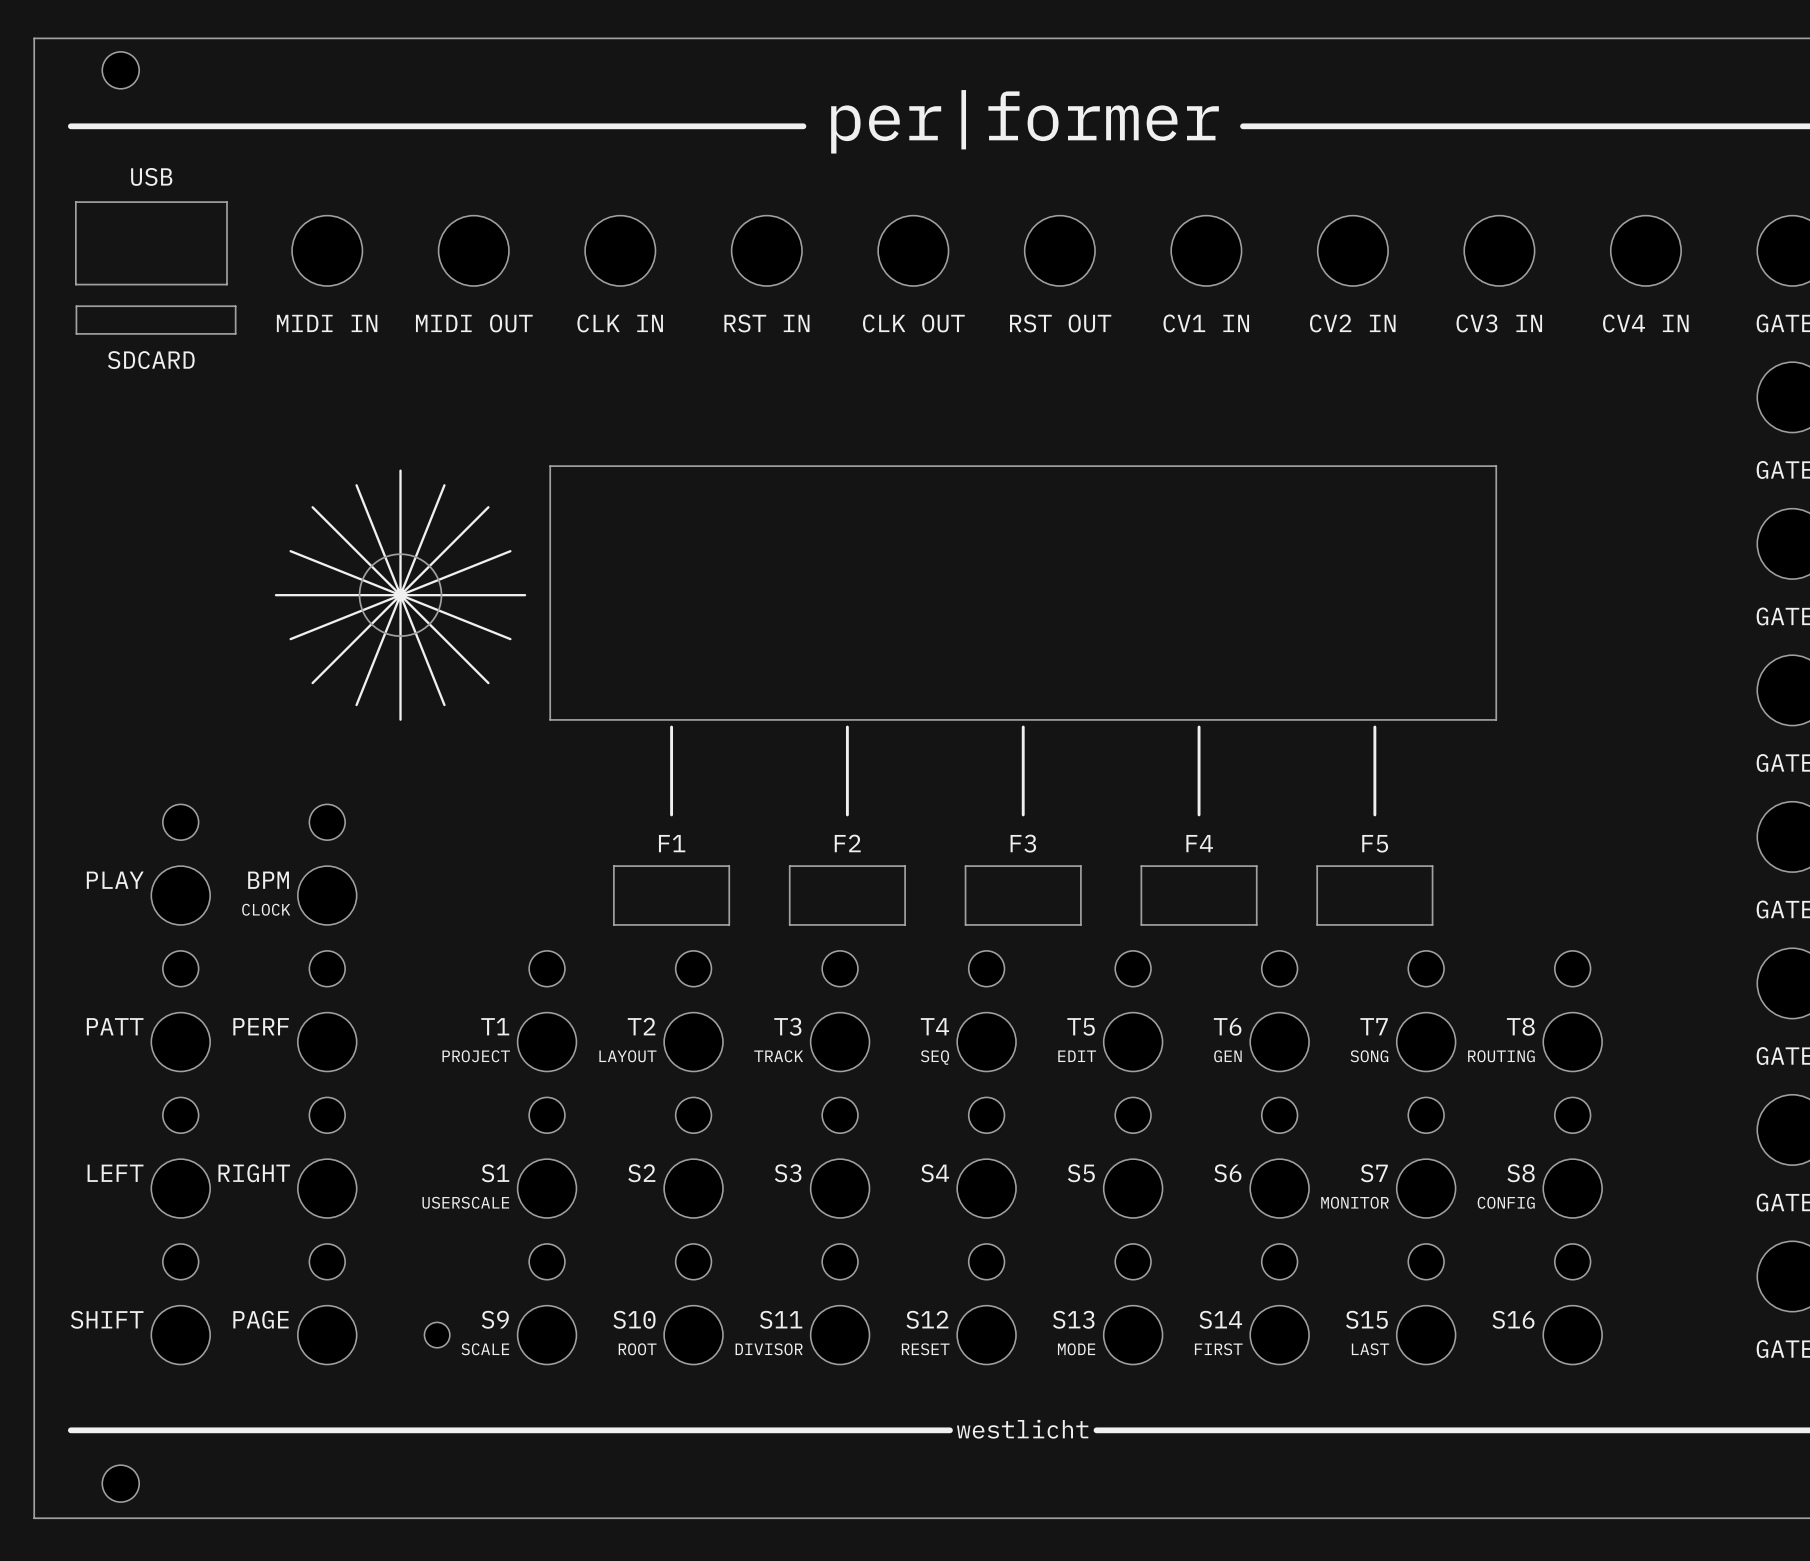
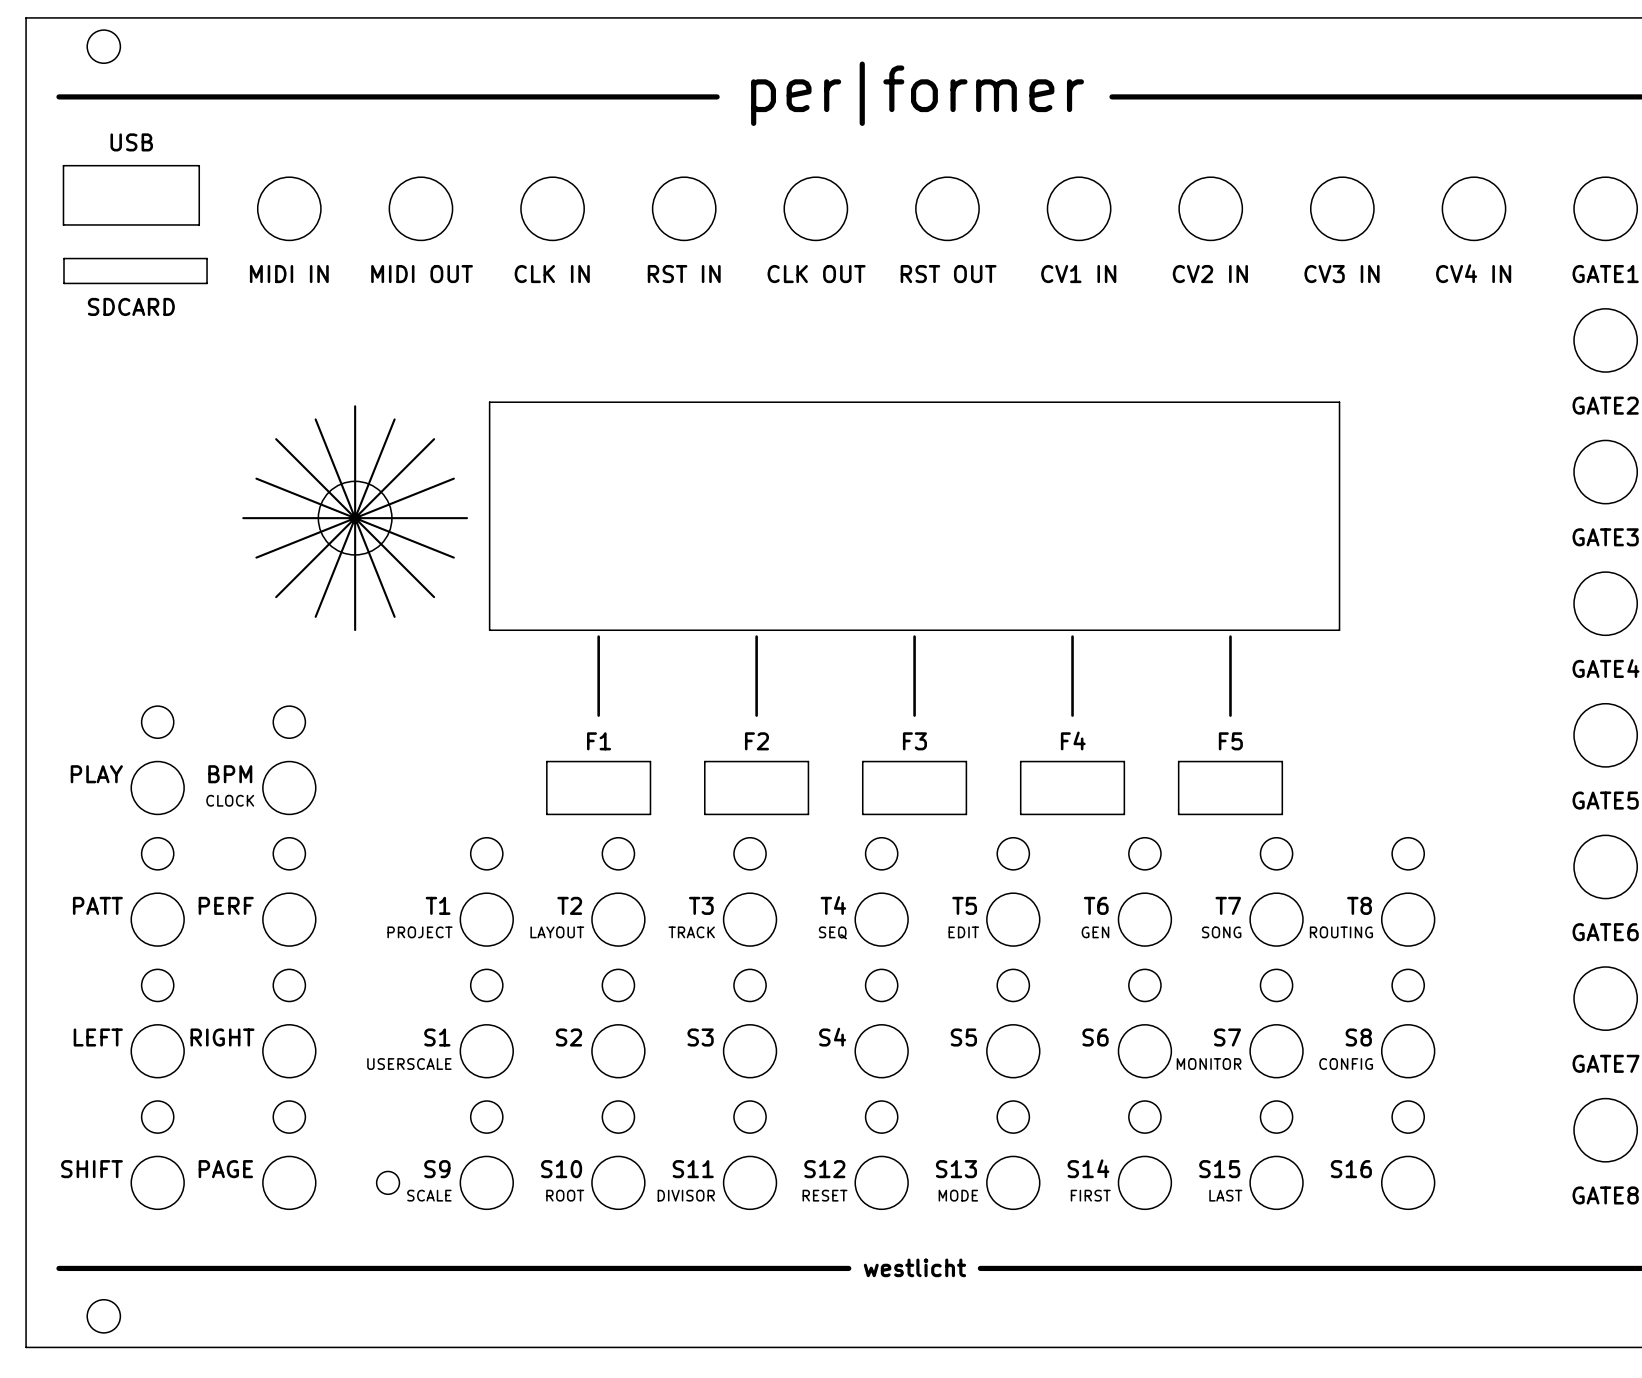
drawing shape: [74, 201, 228, 286] -> [62, 164, 201, 226]

